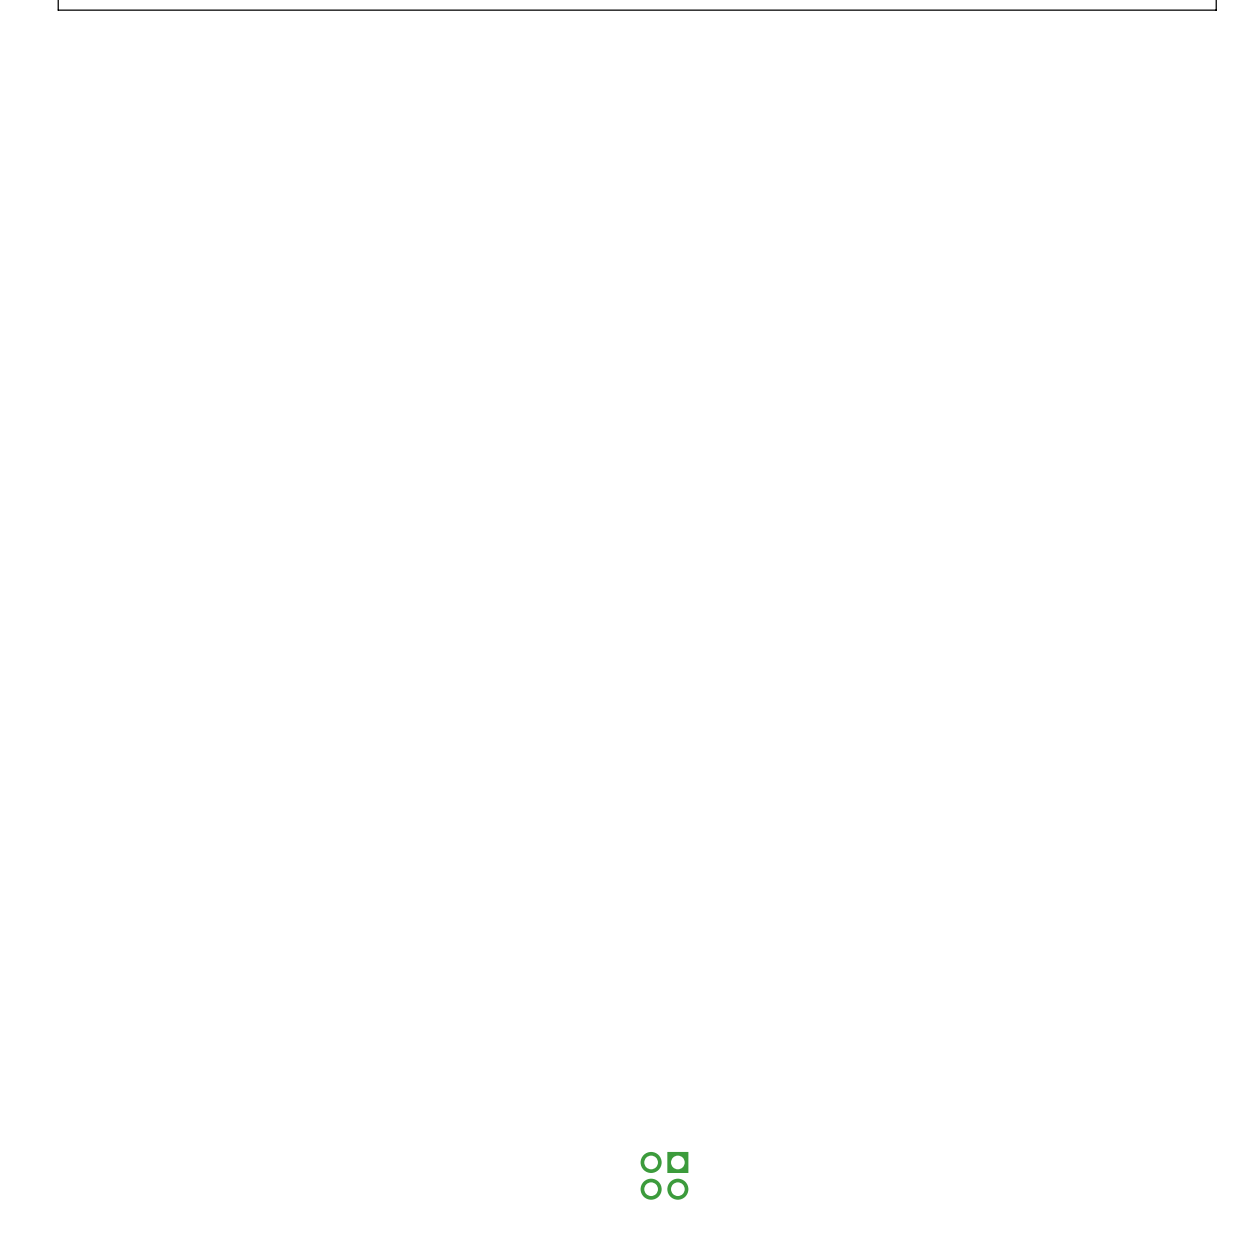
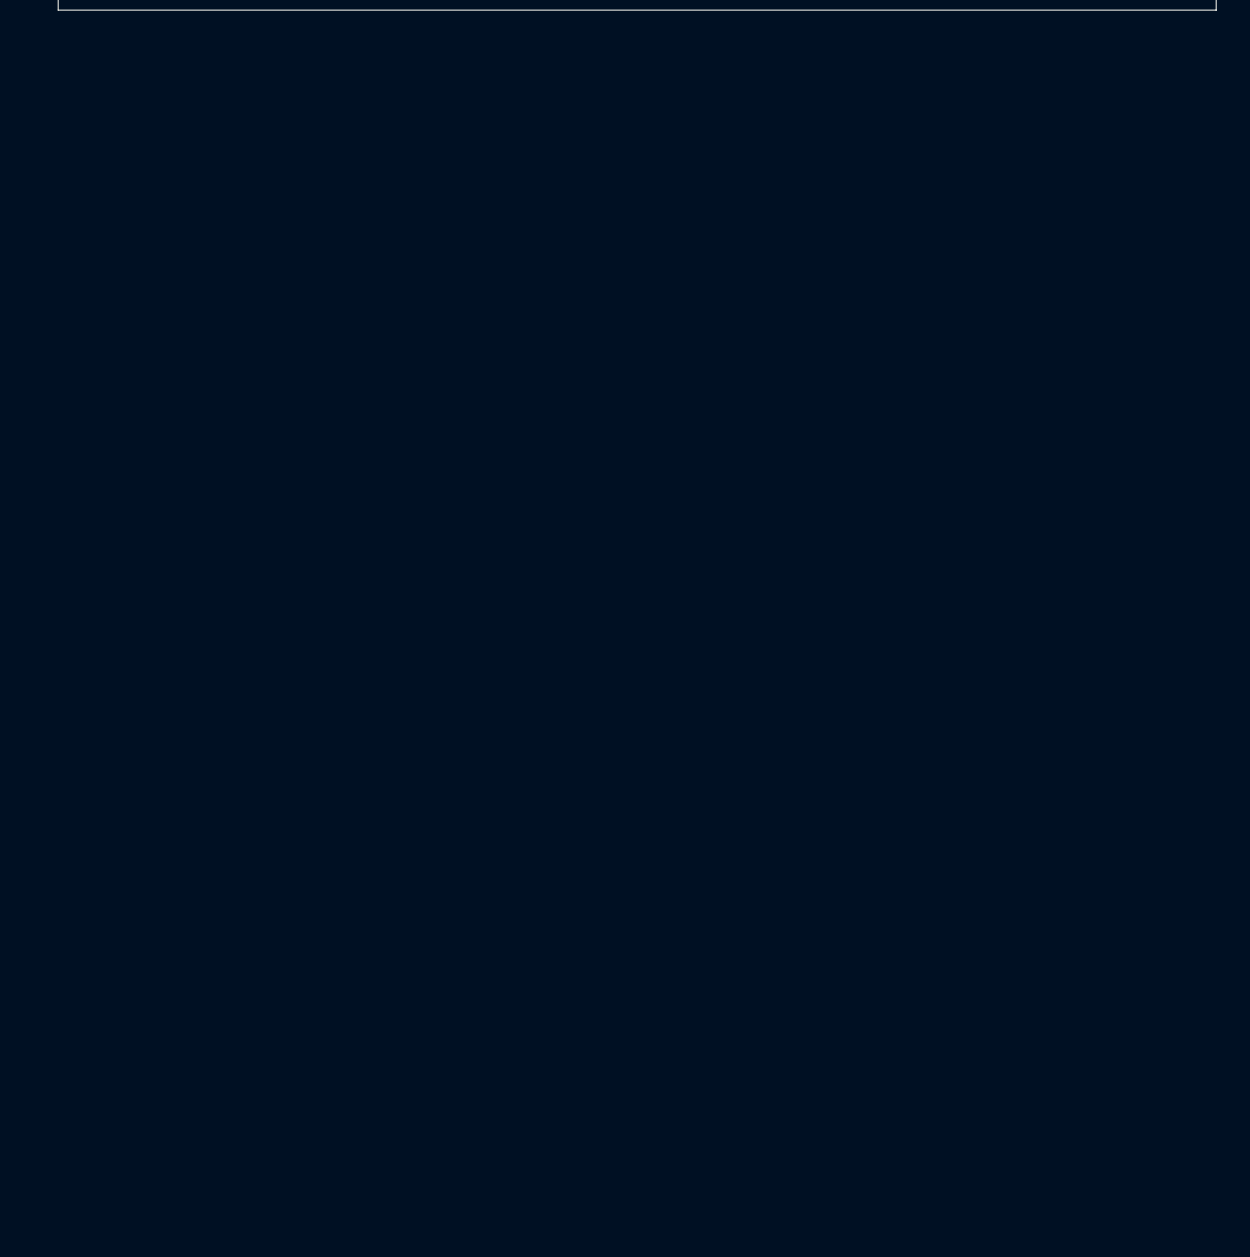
part: (664, 1175) -> none

